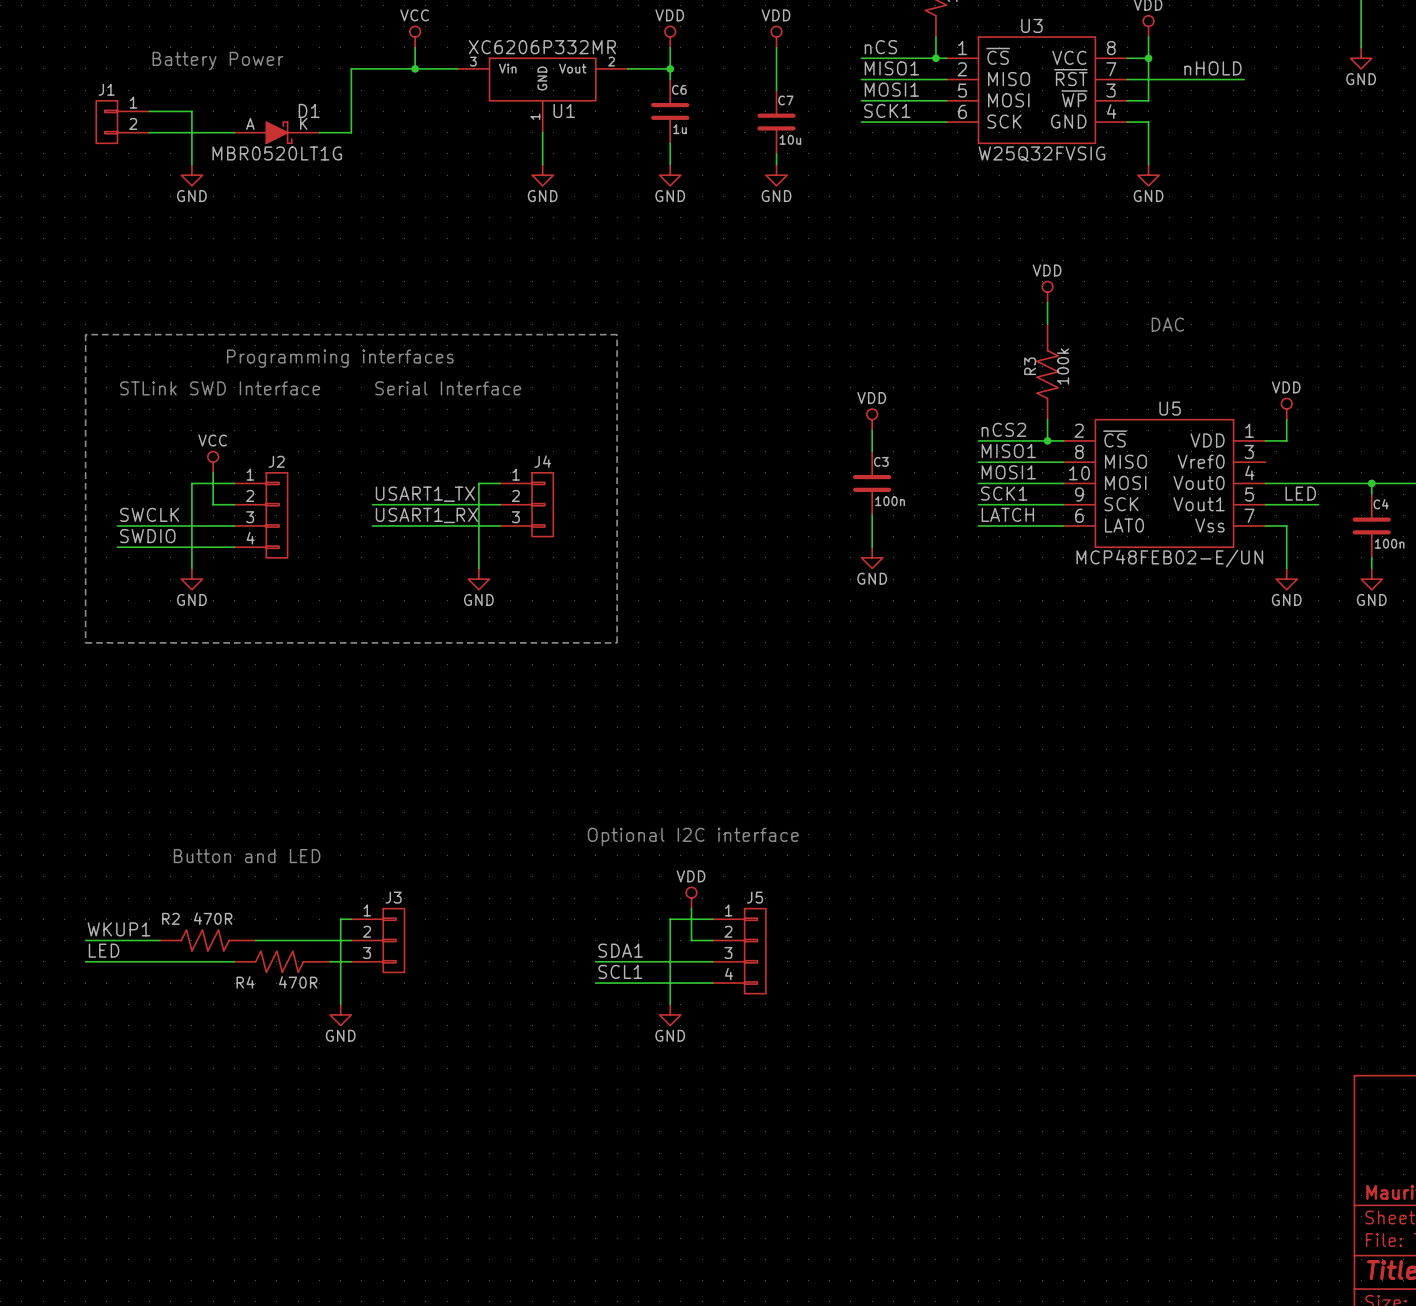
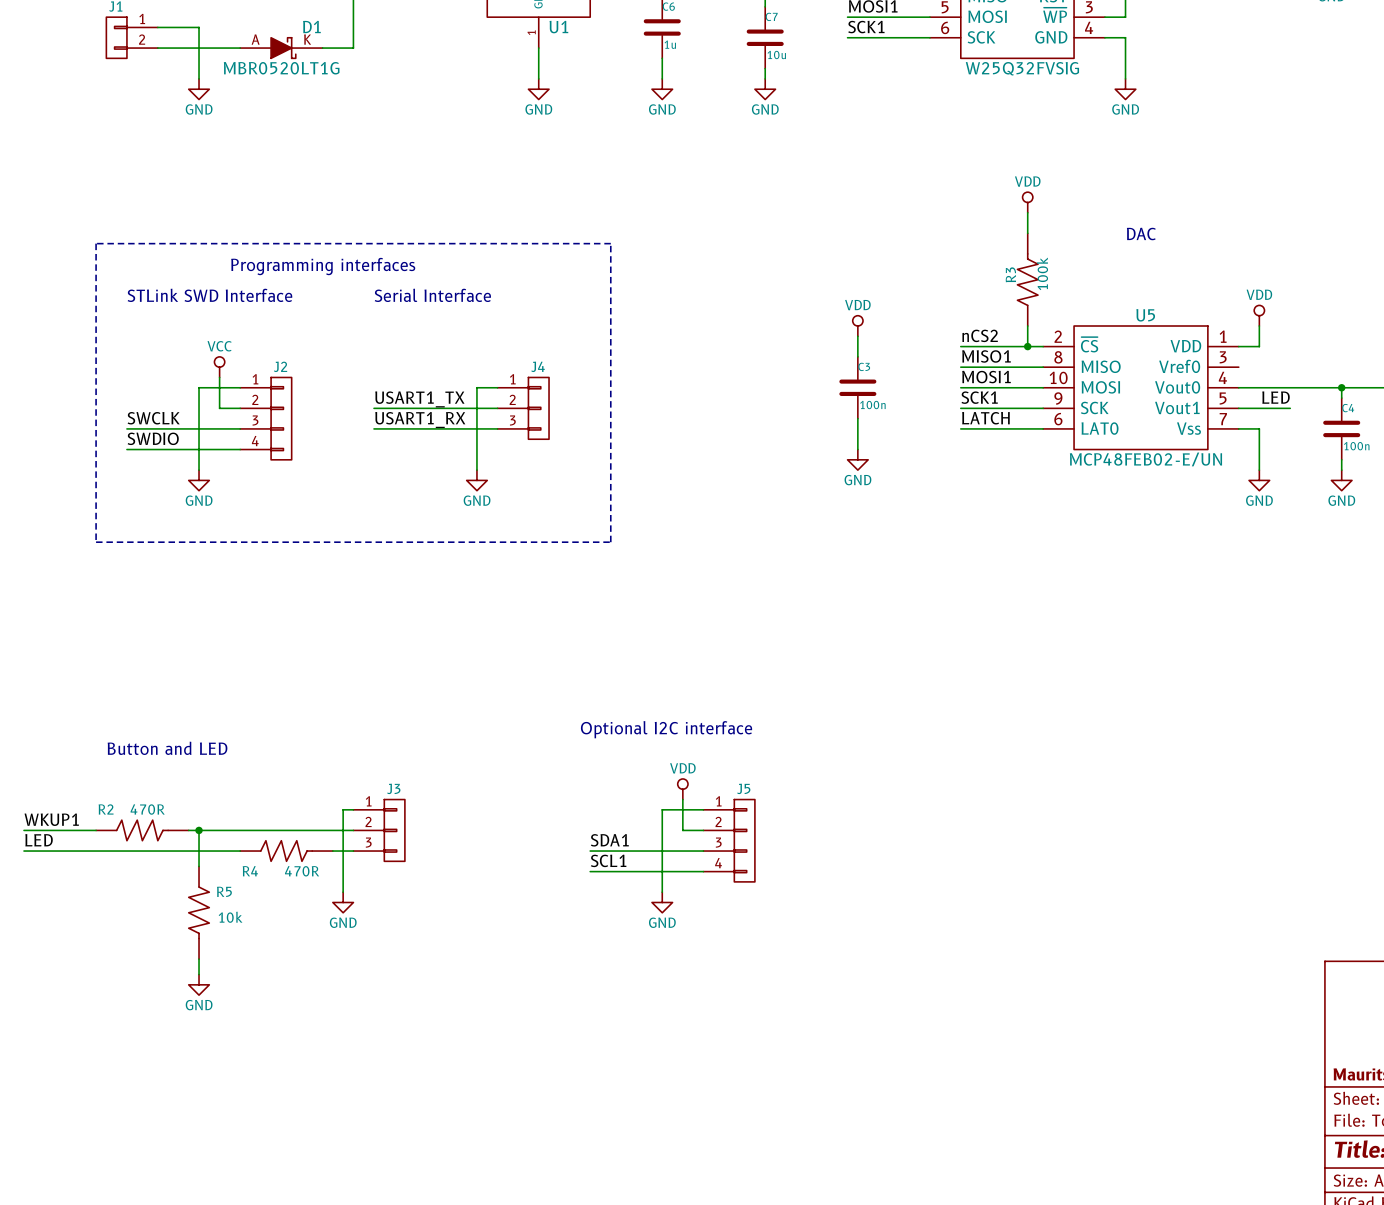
text position: Button and LED (247, 856) -> Button and LED (167, 748)
label position: WKUP1 (118, 929) -> WKUP1 (51, 819)
wire: (85, 940) (160, 940) -> (96, 830) (24, 830)
wire: none -> (199, 830) (199, 866)
junction: none -> (199, 830)
R2 position: (207, 940) -> (142, 830)
label position: LED (104, 950) -> LED (39, 840)
wire: none -> (24, 851) (96, 851)
R5: none -> 10k (199, 912)
wire: none -> (199, 959) (199, 974)
power symbol: none -> GND (199, 984)

